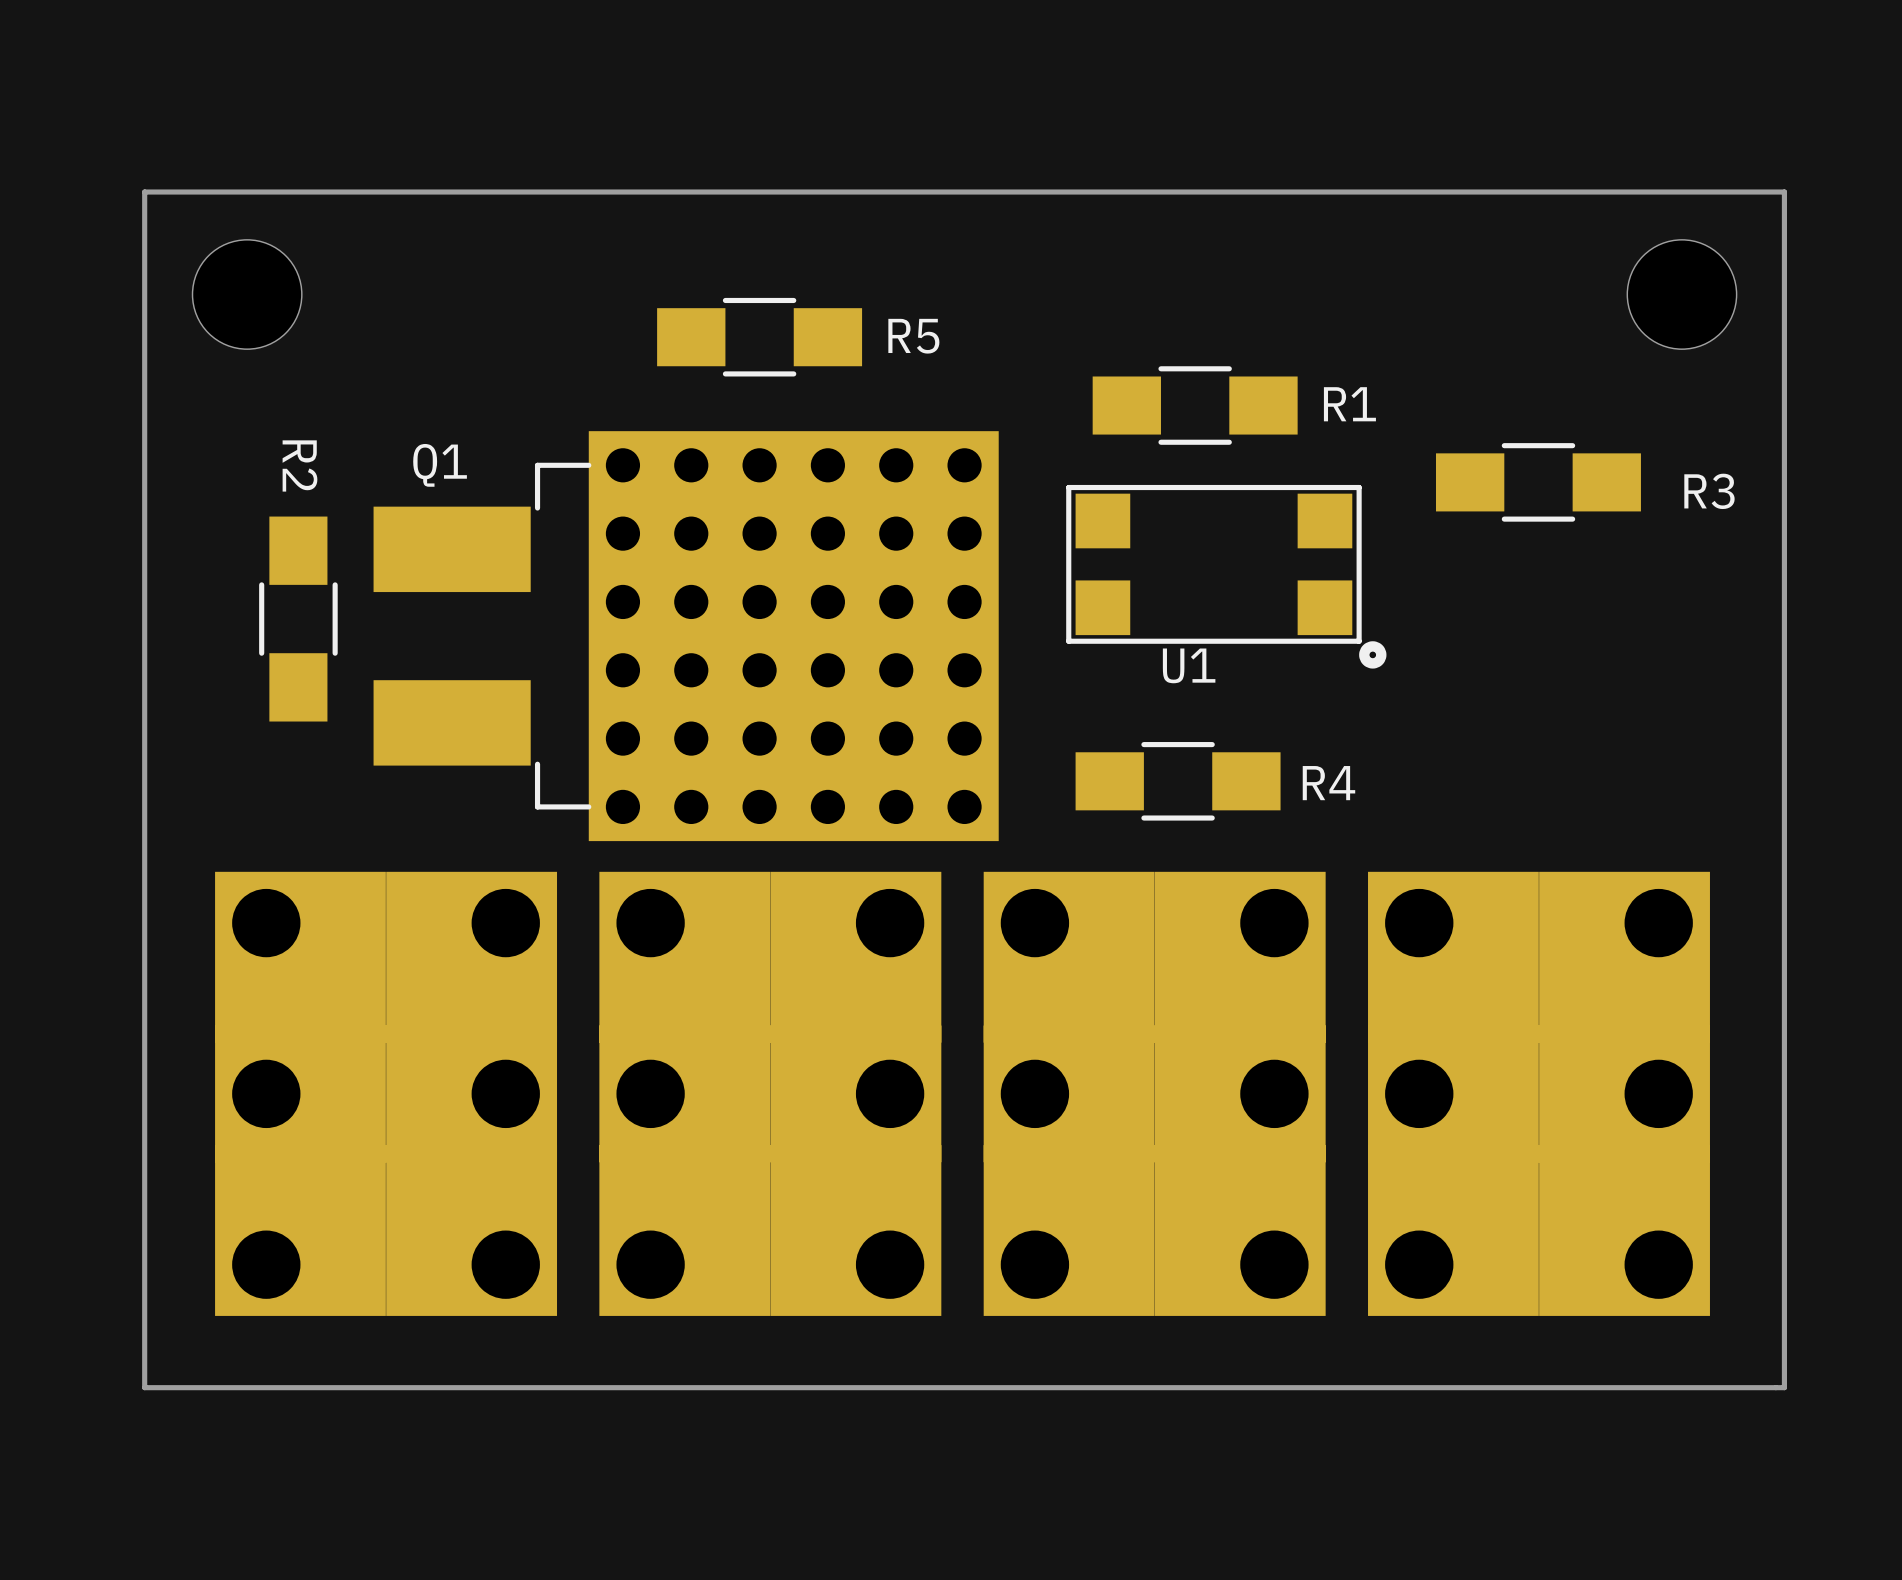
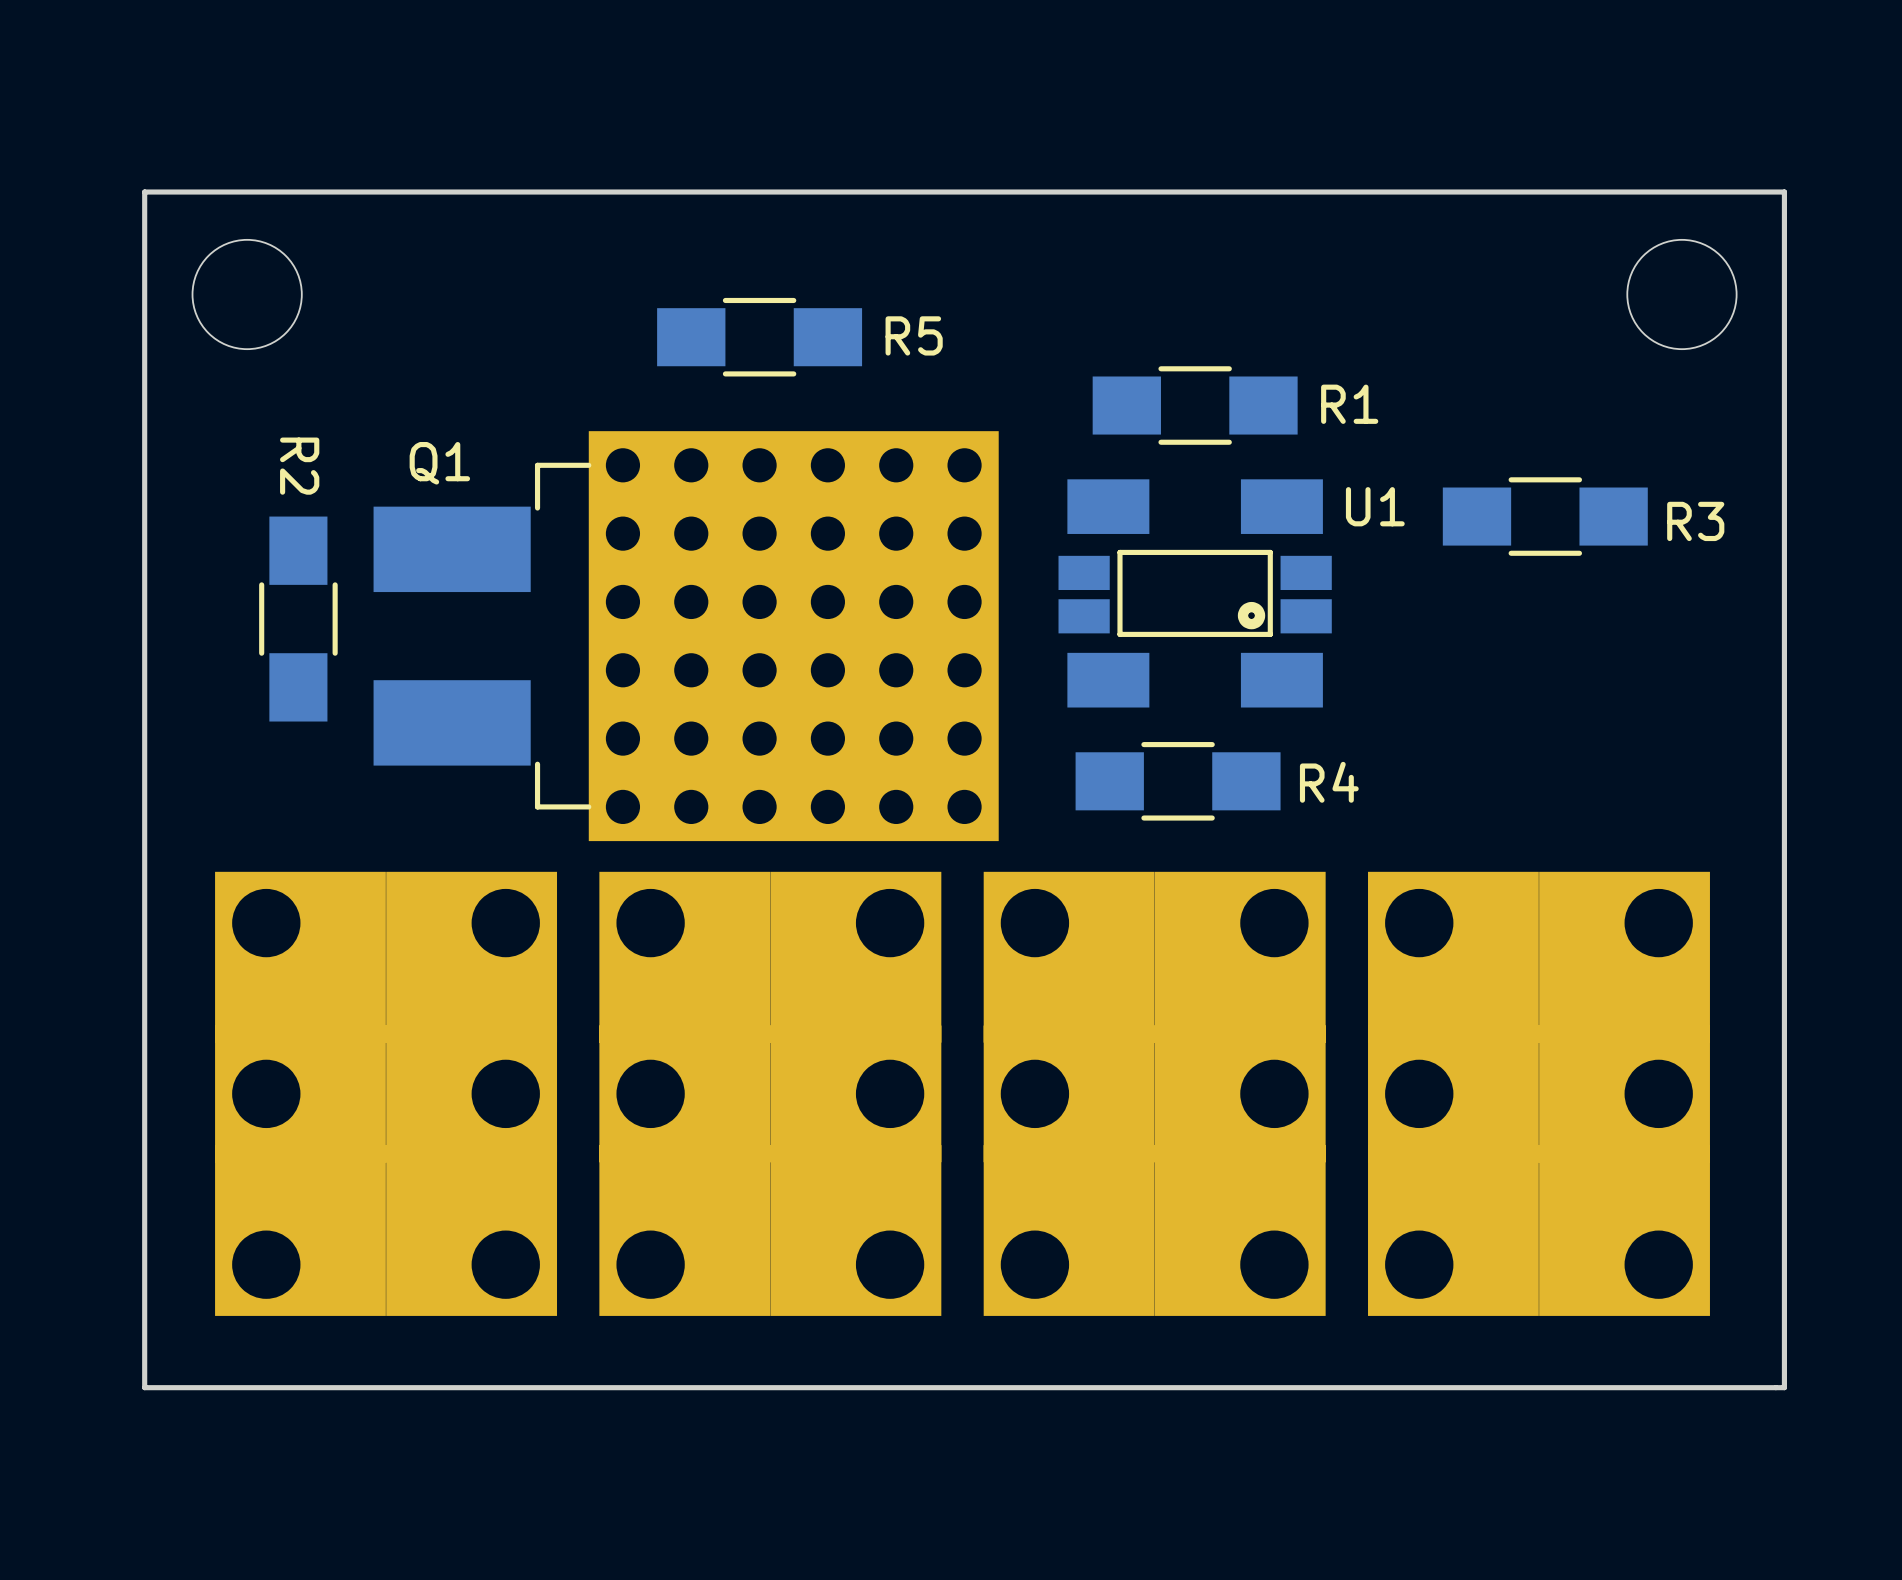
R3 position: (1538, 482) -> (1545, 516)
U1 footprint: [1066, 484, 1387, 669] -> [1058, 479, 1332, 708]
R3 name position: R3 (1709, 491) -> R3 (1695, 521)
U1 name position: U1 (1189, 665) -> U1 (1375, 506)

